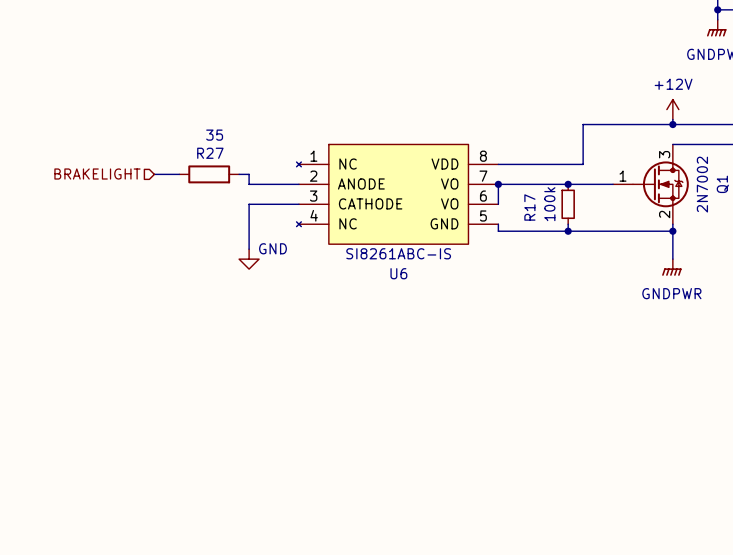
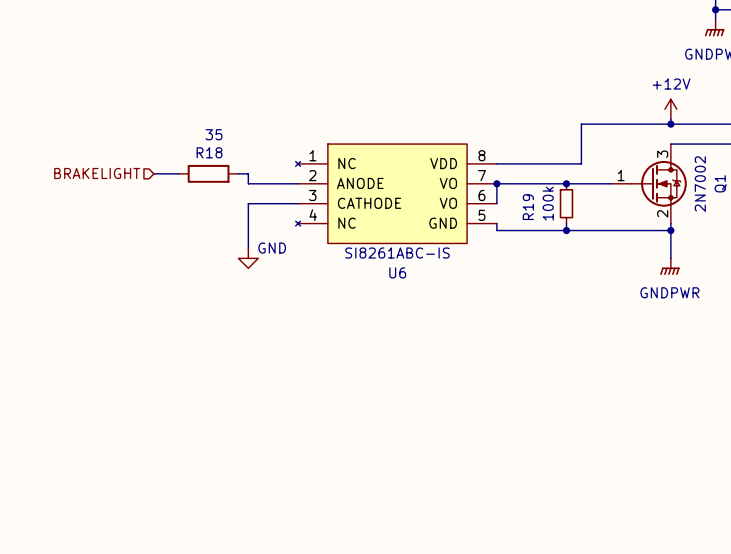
R27 name: R27 (210, 153) -> R18 (209, 152)
R17 name: R17 (529, 207) -> R19 (528, 207)

